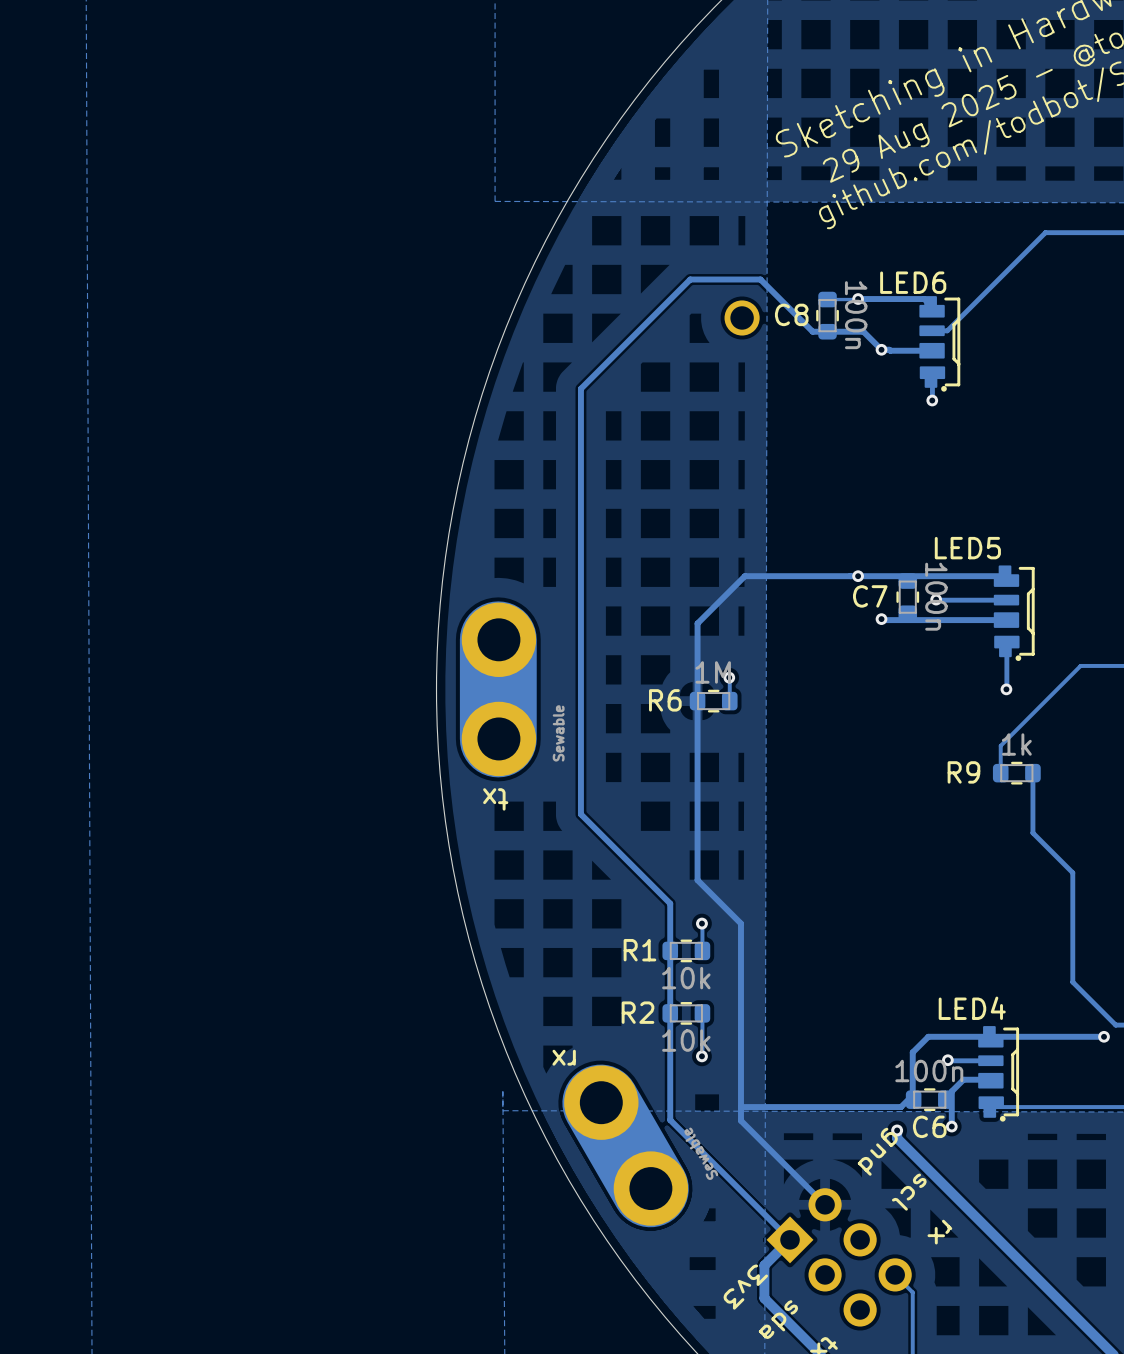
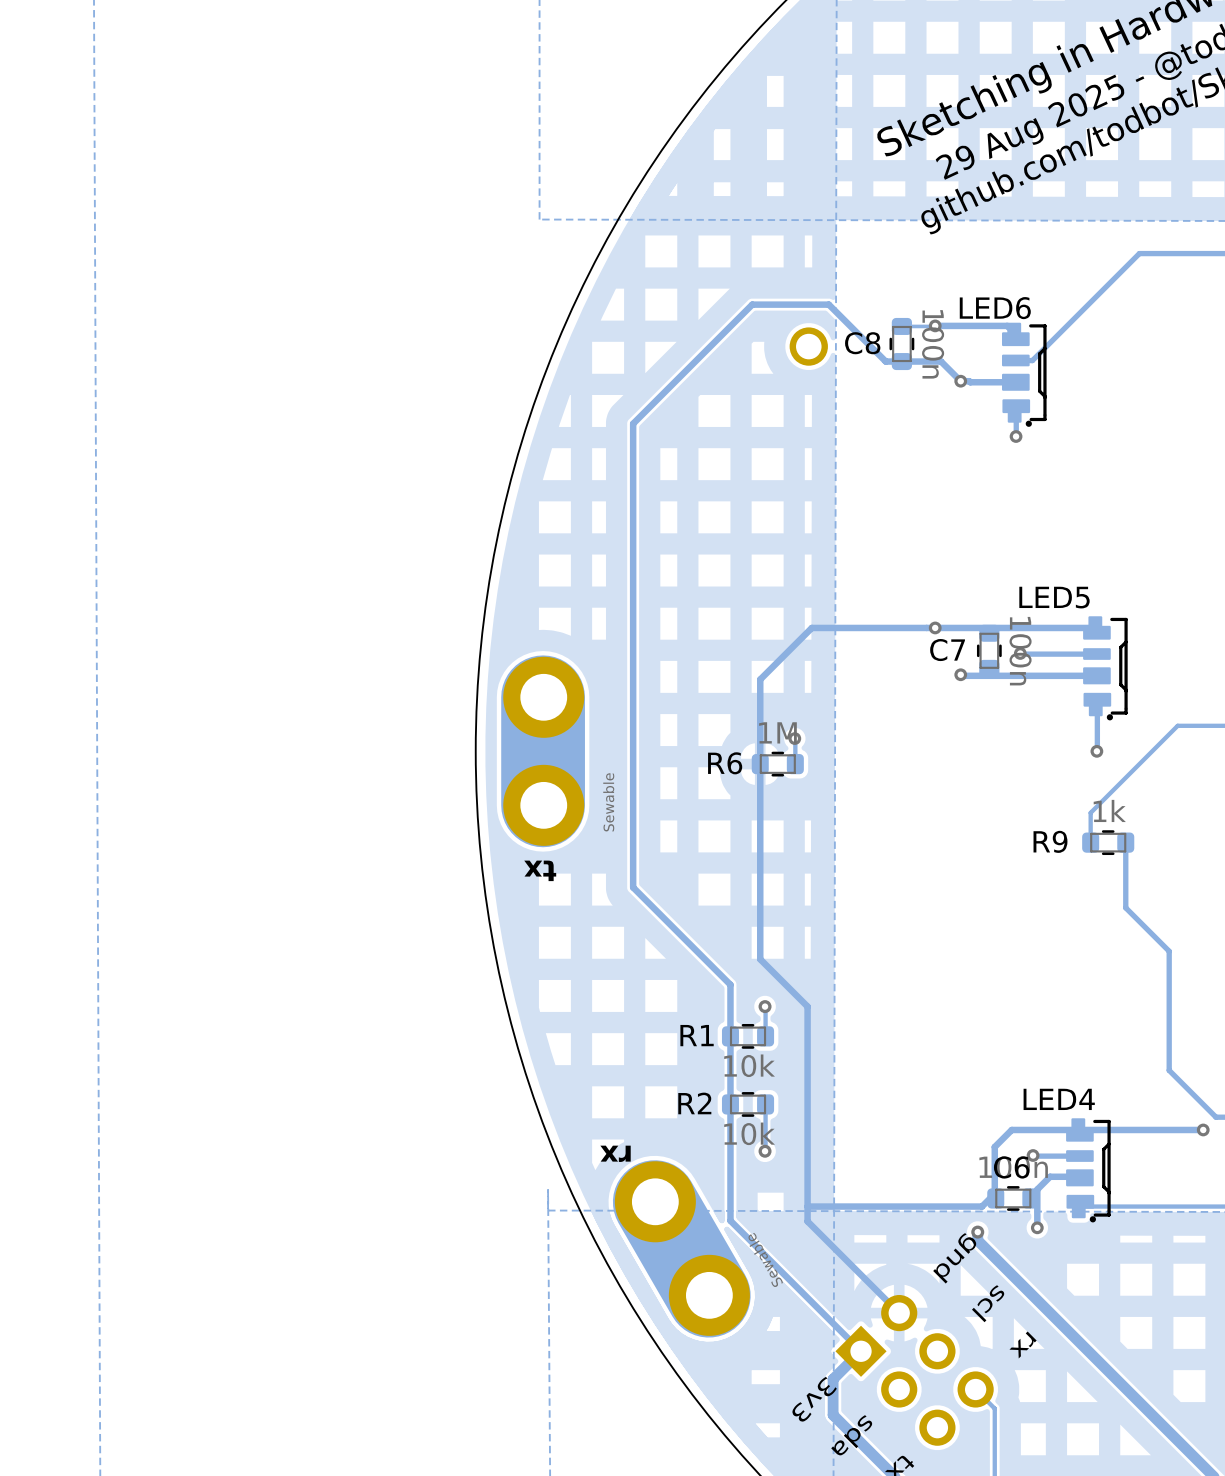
C6 name position: C6 (929, 1126) -> C6 (1011, 1167)

